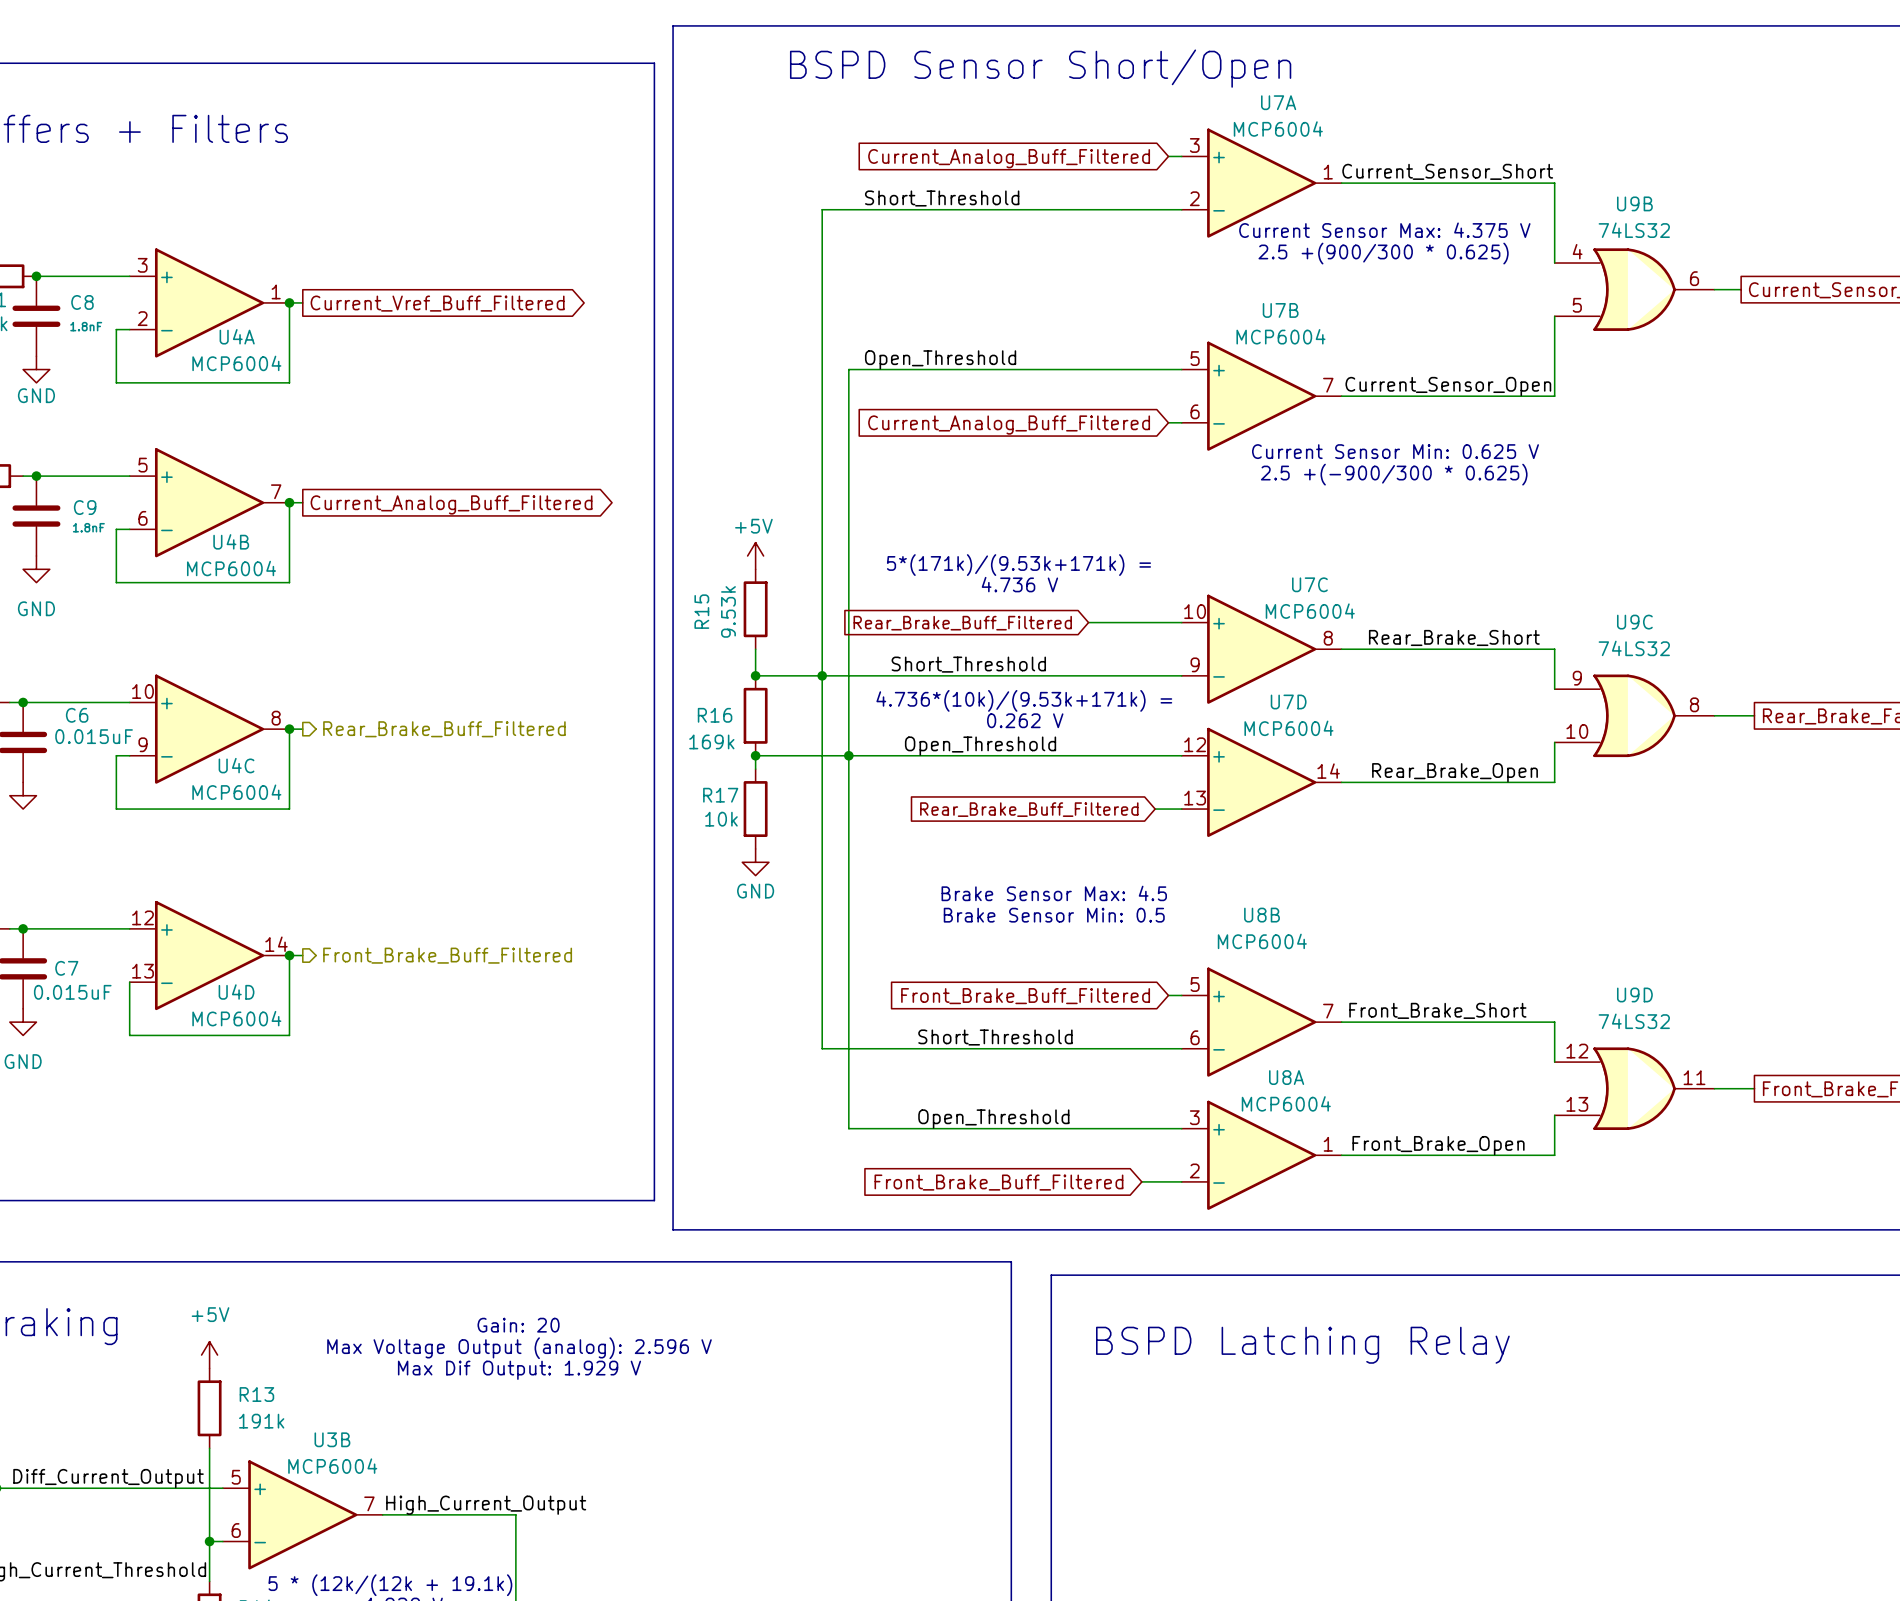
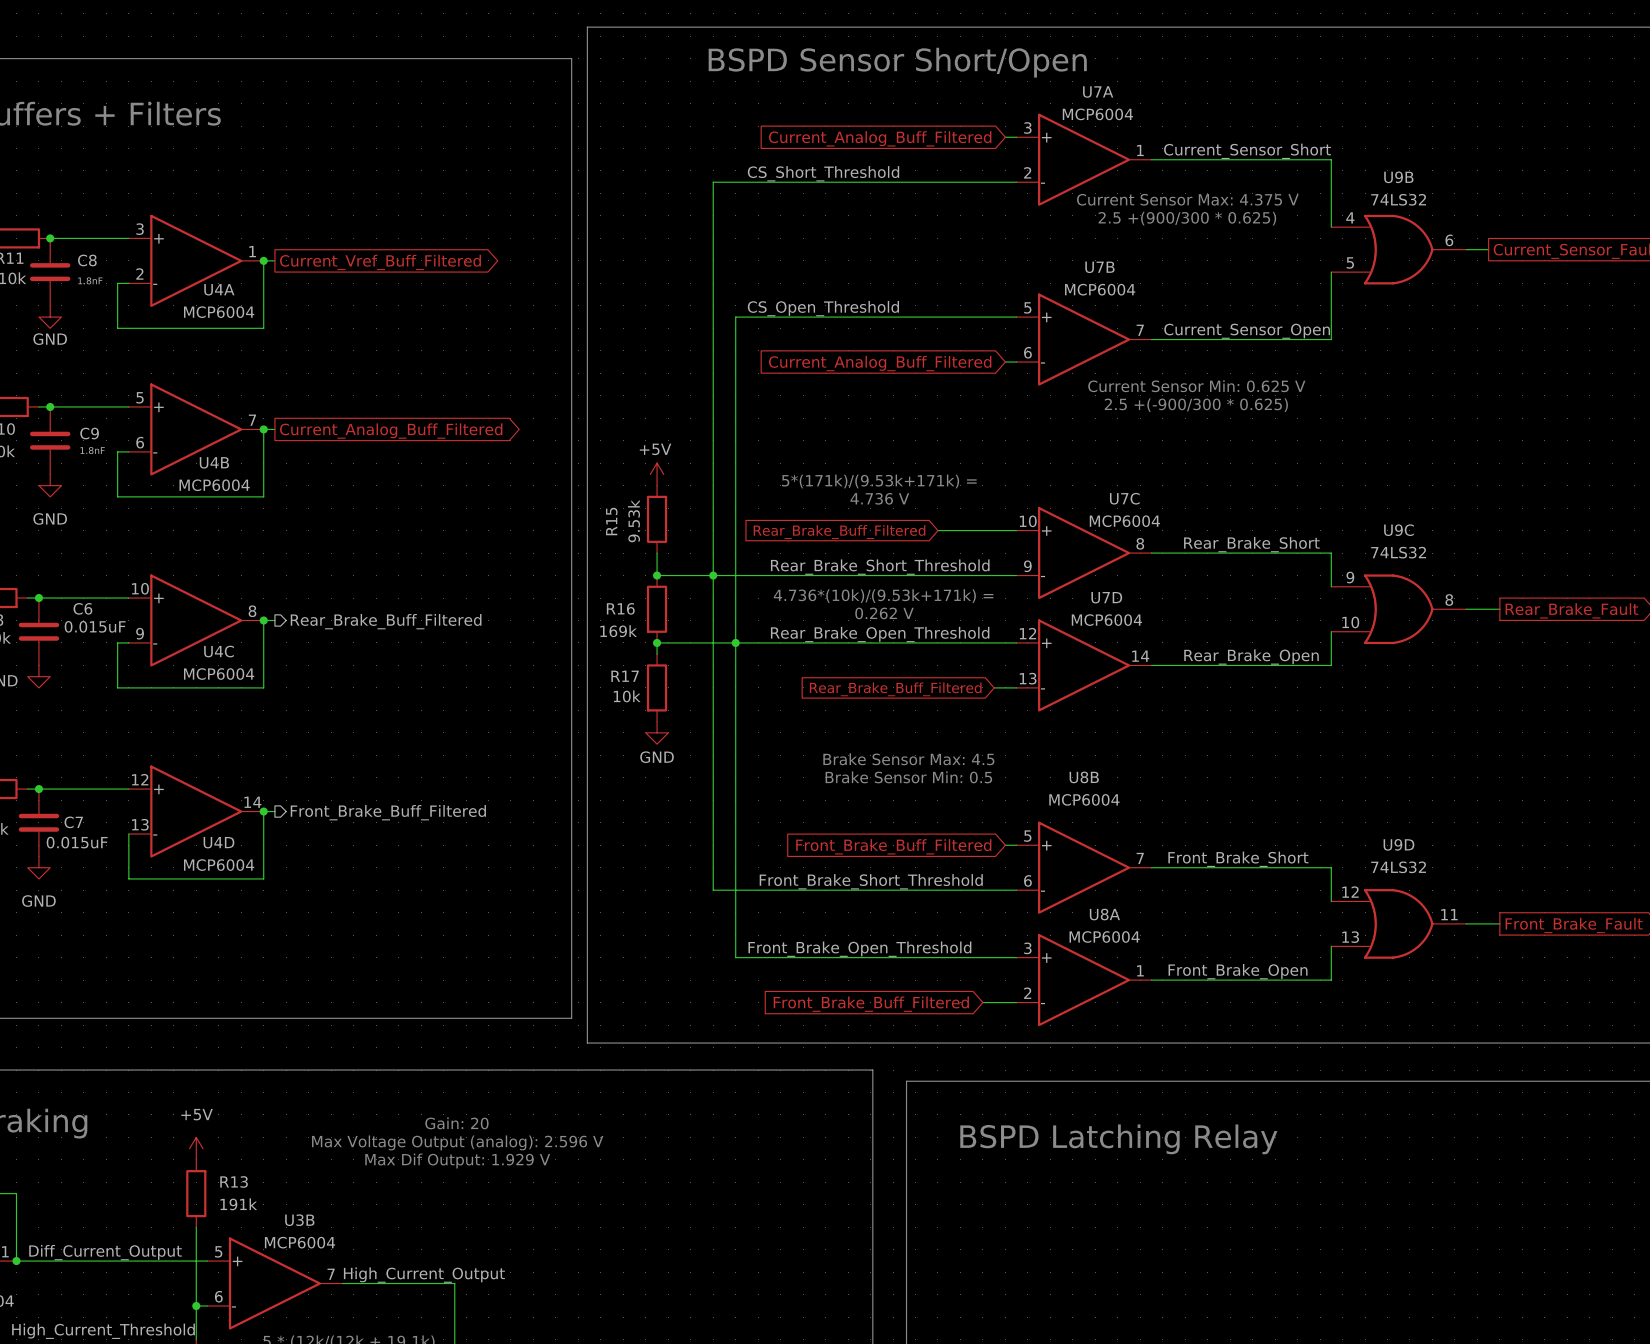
label: Short_Threshold (942, 198) -> CS_Short_Threshold (823, 173)
label: Open_Threshold (940, 359) -> CS_Open_Threshold (823, 308)
label: Short_Threshold (968, 664) -> Rear_Brake_Short_Threshold (880, 567)
label: Open_Threshold (980, 746) -> Rear_Brake_Open_Threshold (880, 634)
label: Short_Threshold (995, 1037) -> Front_Brake_Short_Threshold (871, 881)
label: Open_Threshold (993, 1118) -> Front_Brake_Open_Threshold (859, 949)

